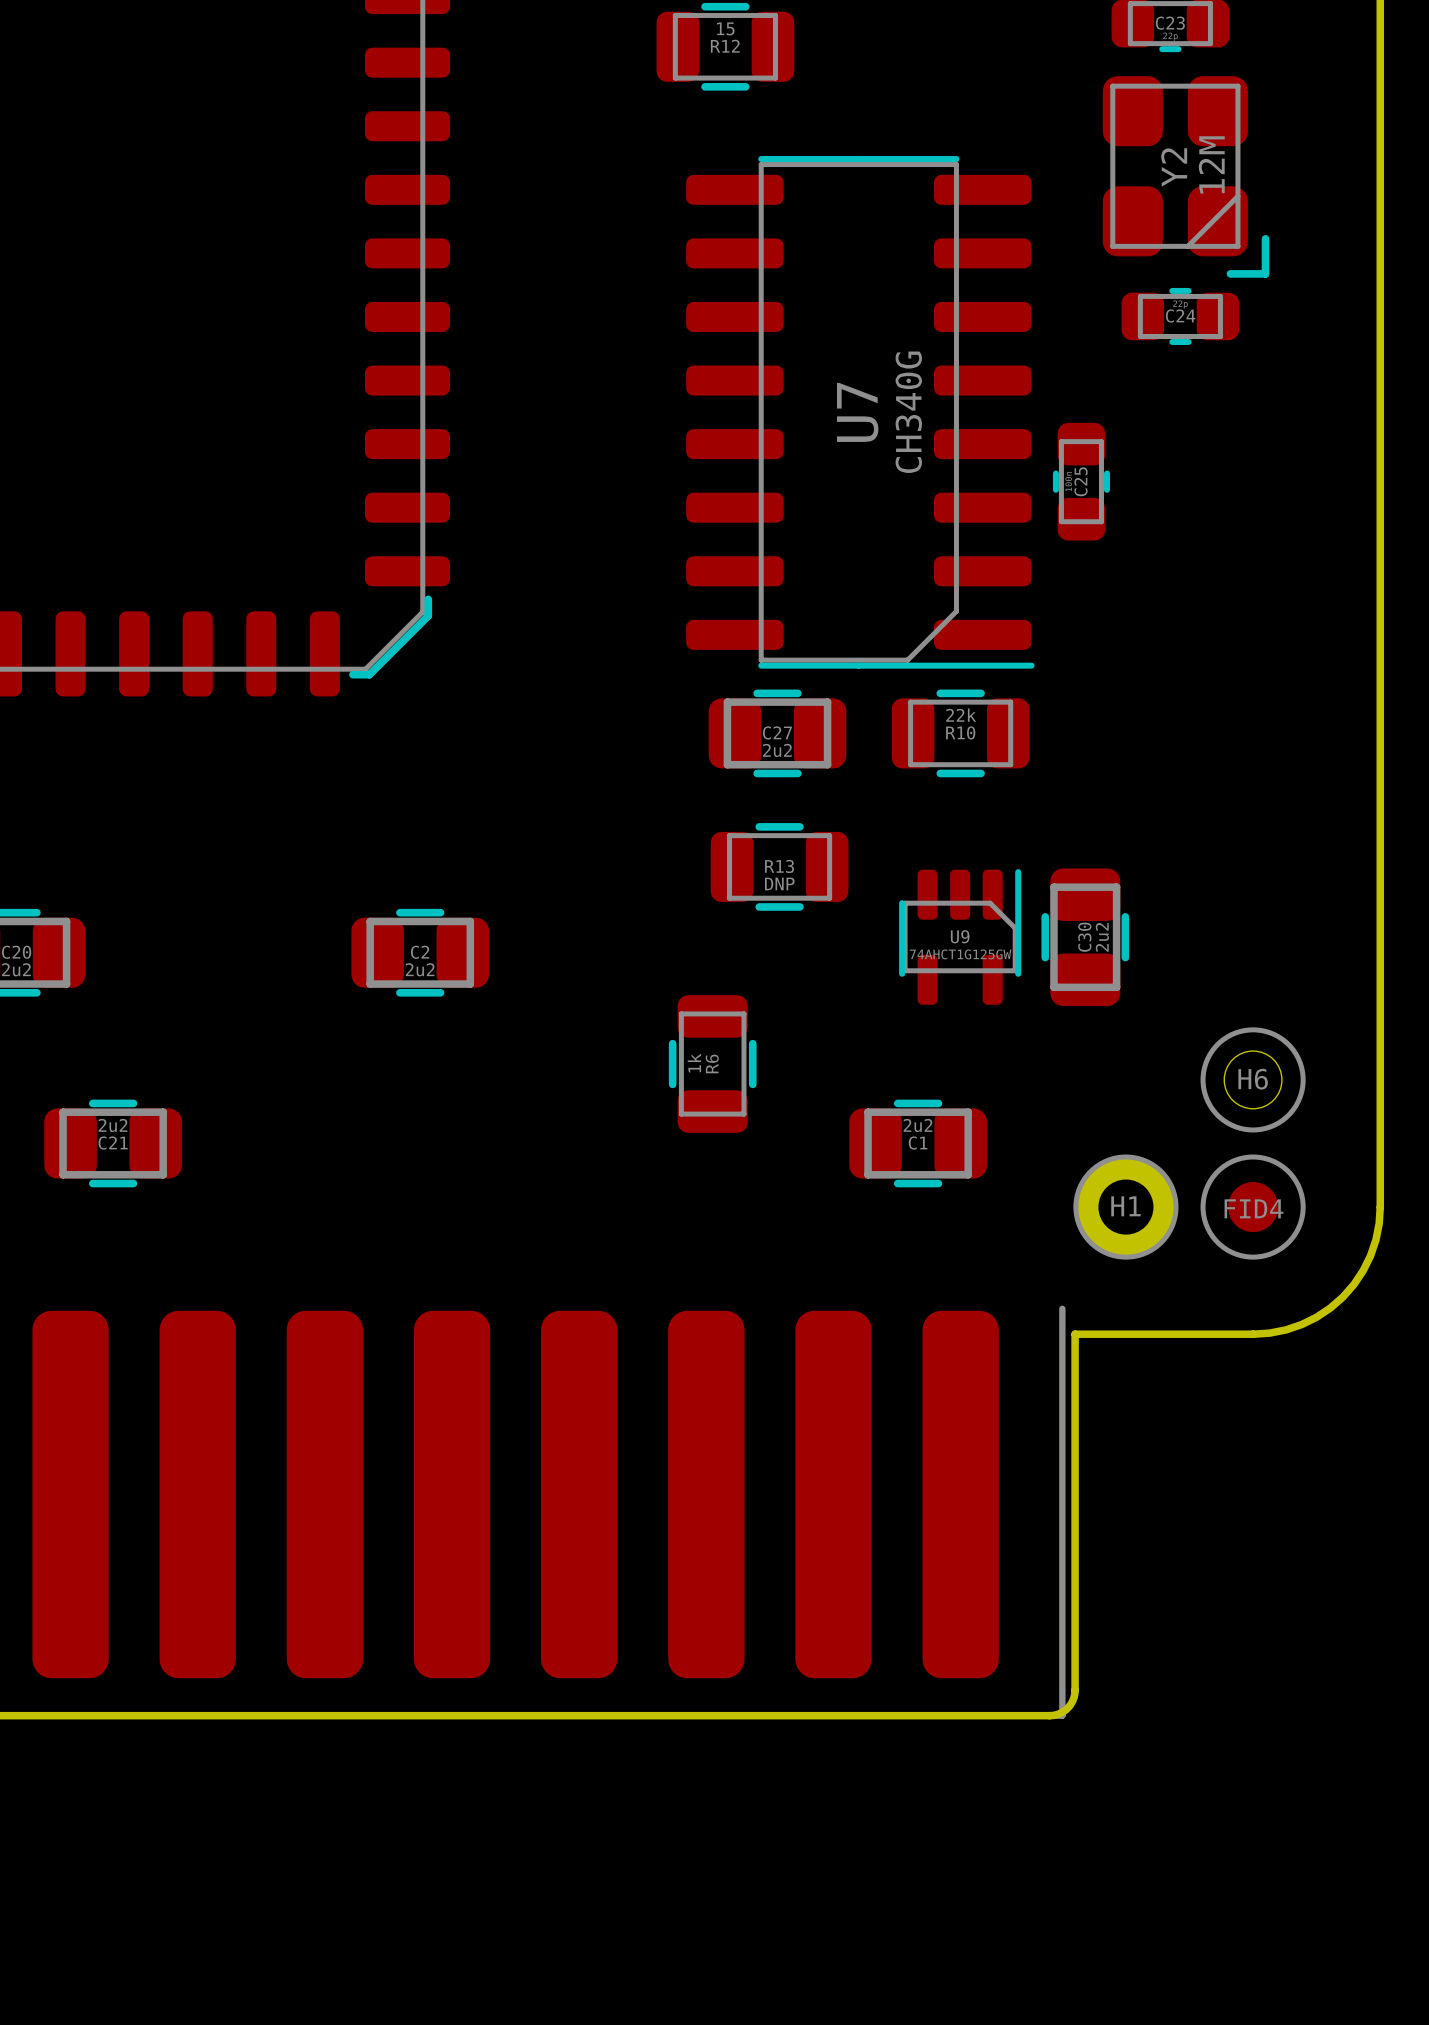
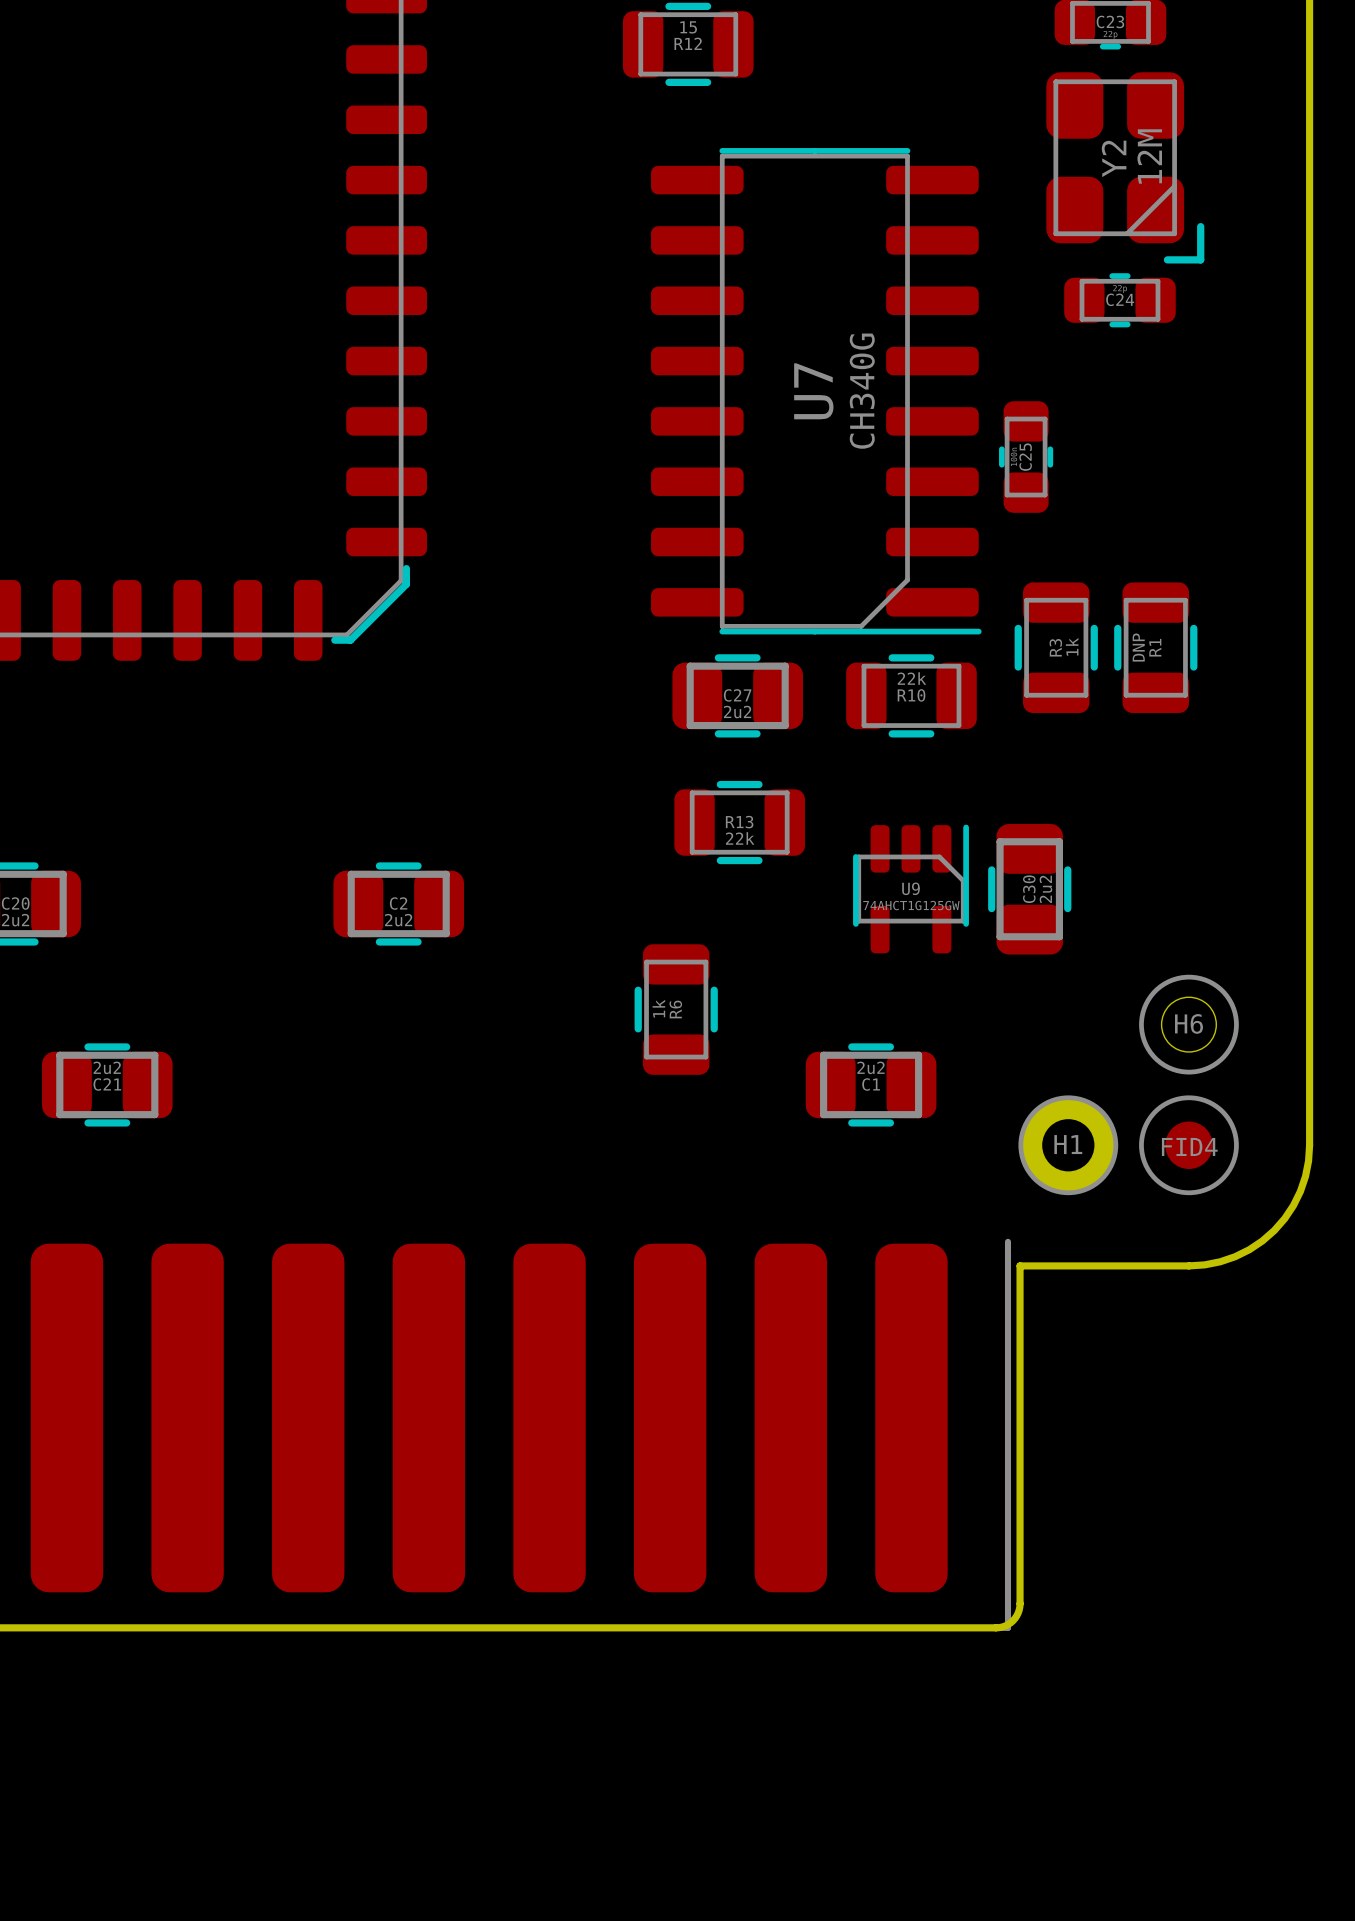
R3: none -> 1k (1056, 647)
R1: none -> DNP (1155, 647)
R13 value: DNP (779, 883) -> 22k (740, 838)

